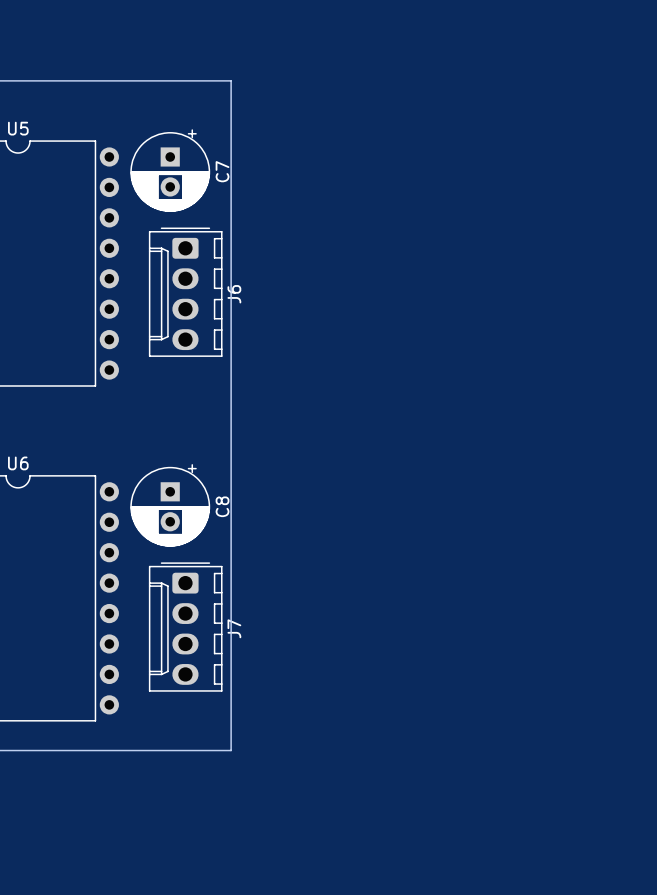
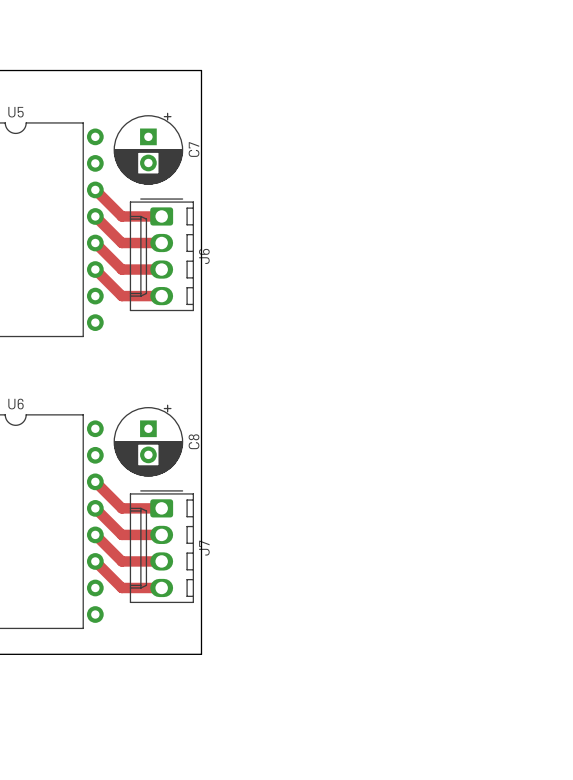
track: none -> (95, 189) (121, 216) (161, 216)
track: none -> (95, 216) (121, 243) (161, 243)
track: none -> (95, 243) (121, 269) (161, 269)
track: none -> (95, 269) (121, 296) (161, 296)
track: none -> (95, 481) (121, 508) (161, 508)
track: none -> (95, 508) (121, 534) (161, 534)
track: none -> (95, 534) (121, 561) (161, 561)
track: none -> (95, 561) (121, 587) (161, 587)

